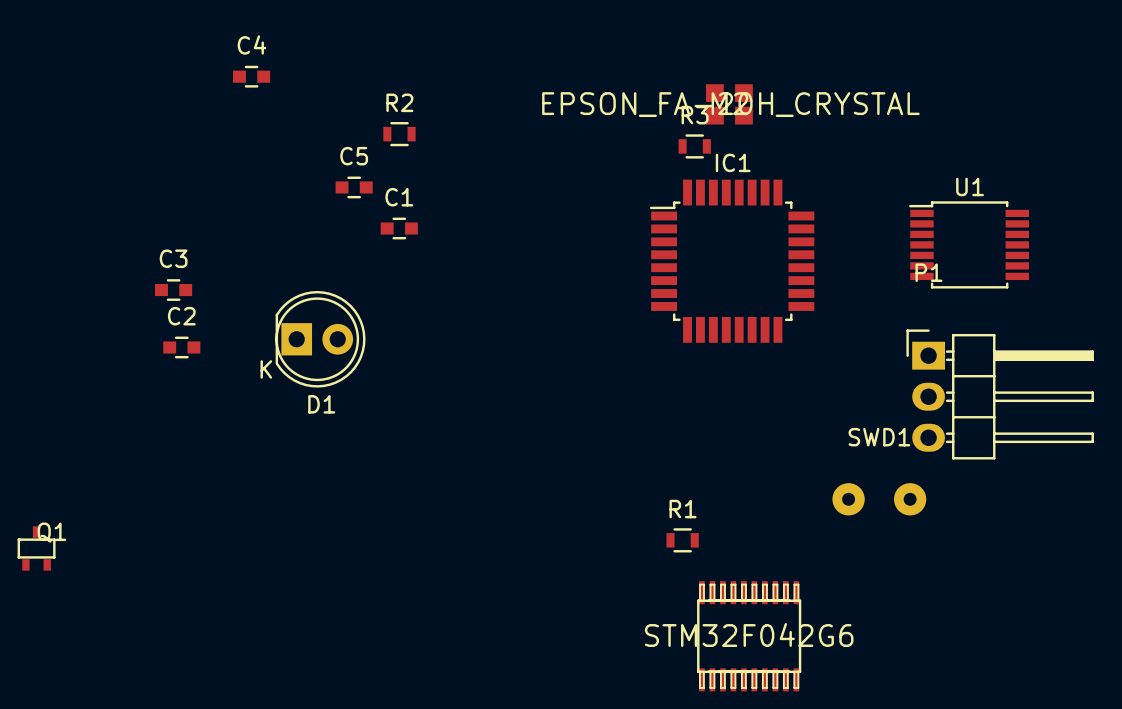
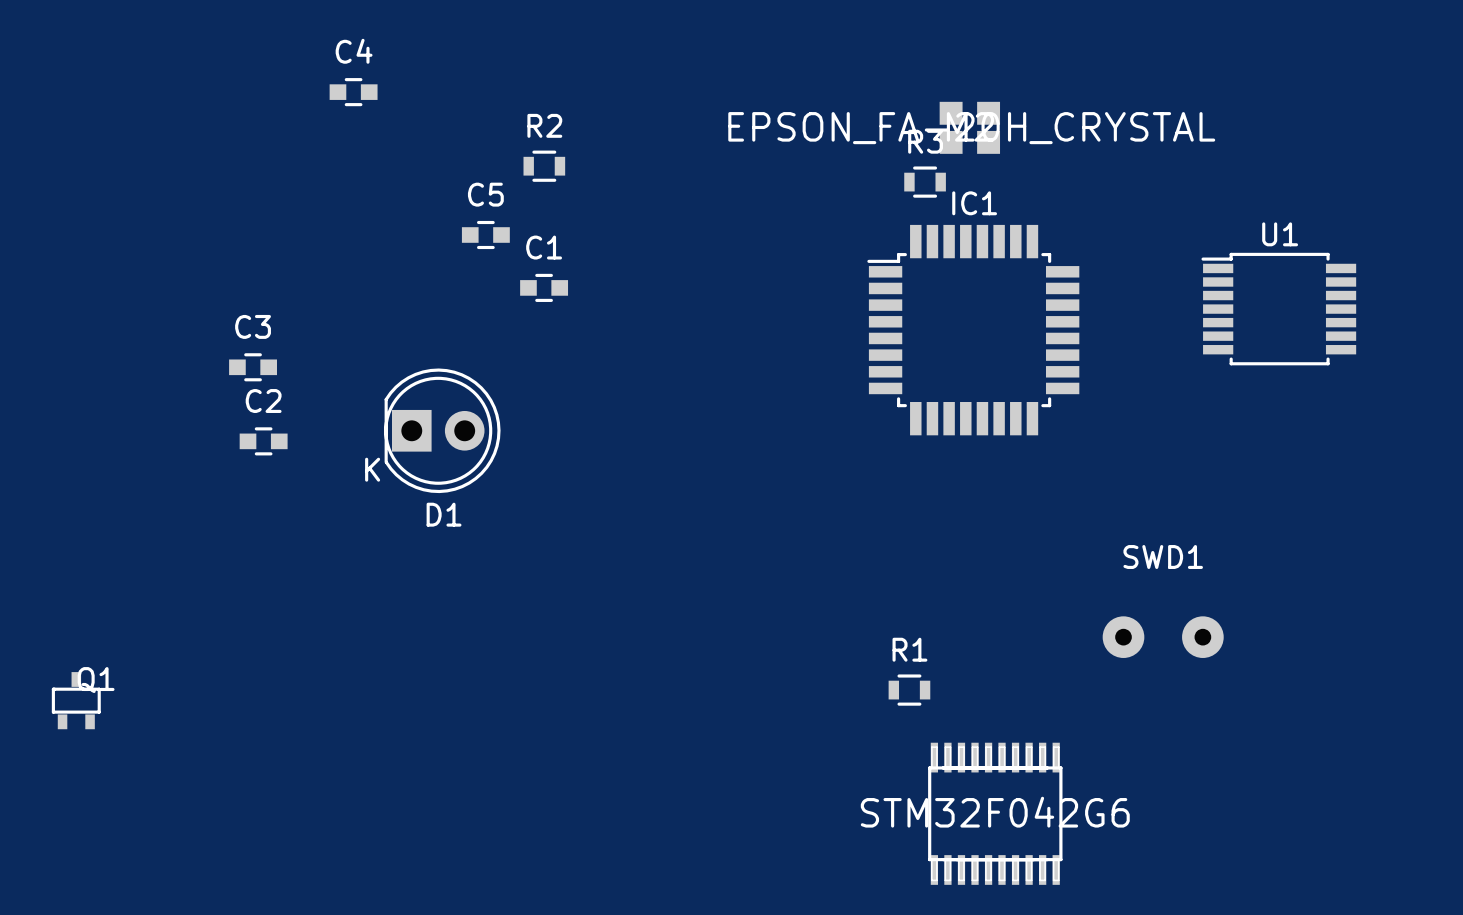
P1: (1000, 394) -> none

